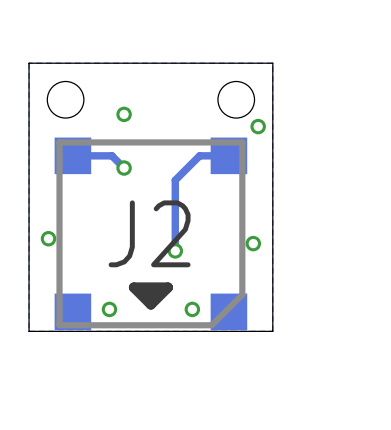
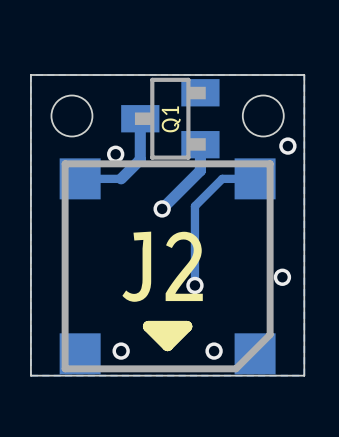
Q1: none -> (170, 118)
via: (124, 114) -> none
track: none -> (200, 144) (200, 170) (162, 208)
via: none -> (115, 154)
track: (109, 155) (111, 155) (124, 168) -> (121, 178) (140, 159) (140, 118)
via: (124, 168) -> none
via: none -> (162, 208)
via: (48, 238) -> none

